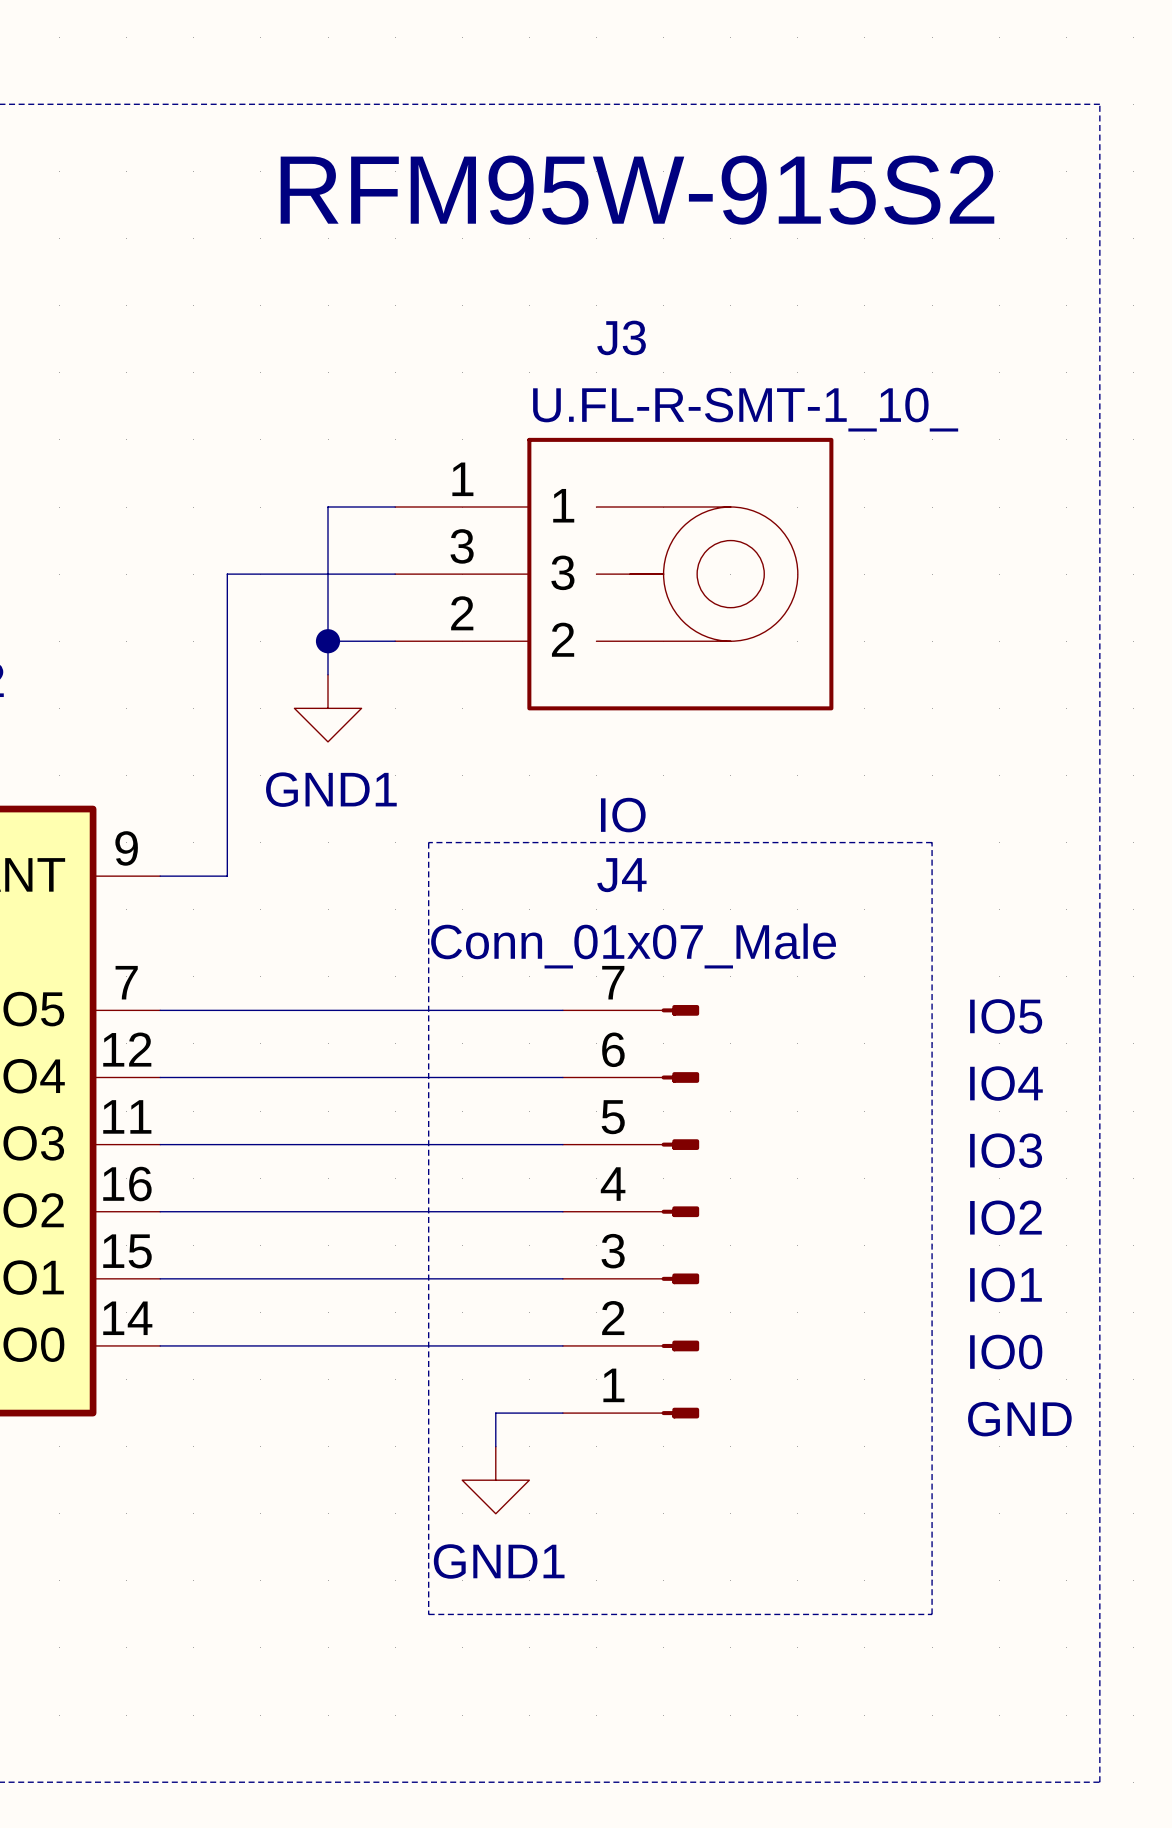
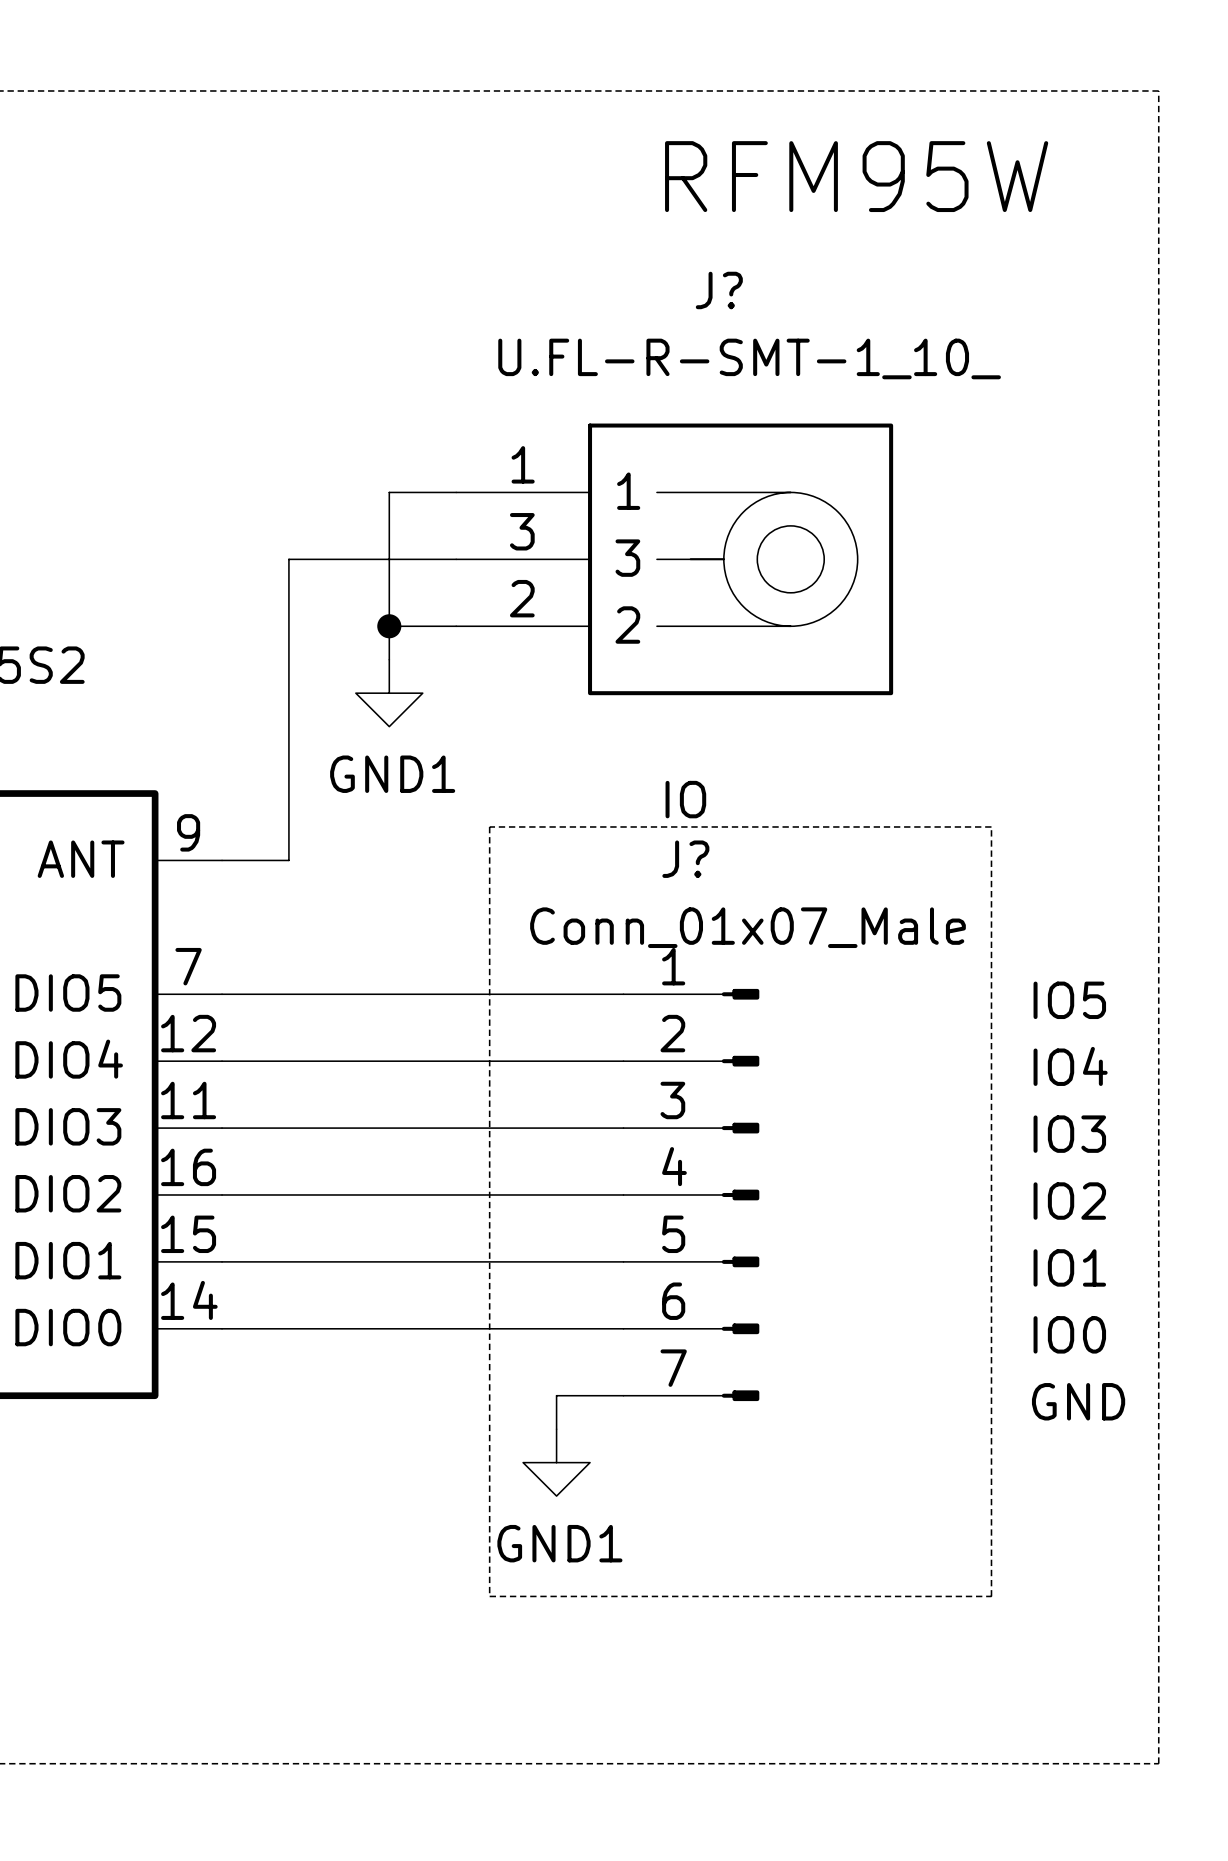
text: RFM95W-915S2 (637, 190) -> RFM95W (856, 176)
J3 name: J3 (621, 337) -> J? (719, 290)
J3 value position: U.FL-R-SMT-1_10_ (745, 409) -> U.FL-R-SMT-1_10_ (749, 358)
J4 name: J4 (621, 875) -> J? (685, 859)
J4 flip: as is (680, 1211) -> up-down (740, 1194)

